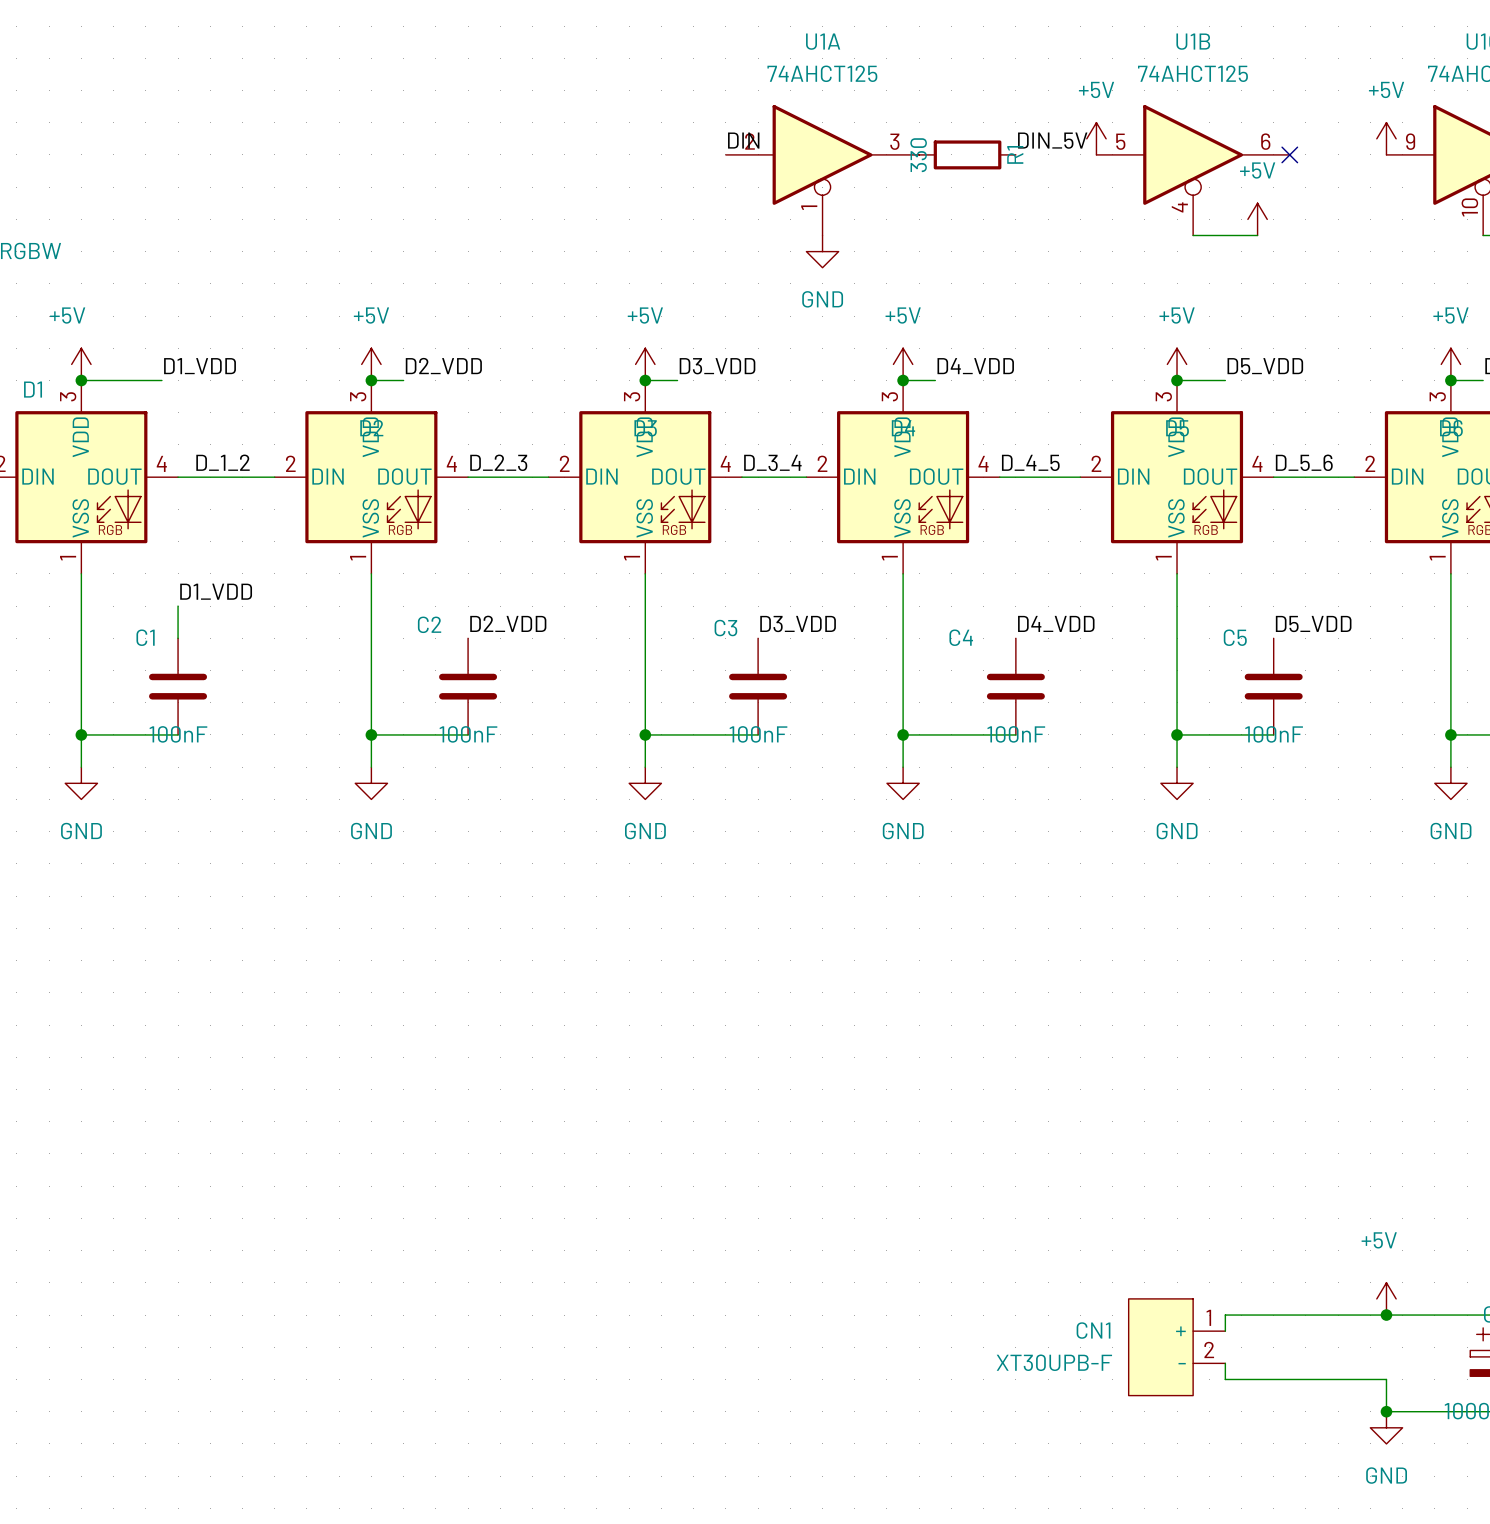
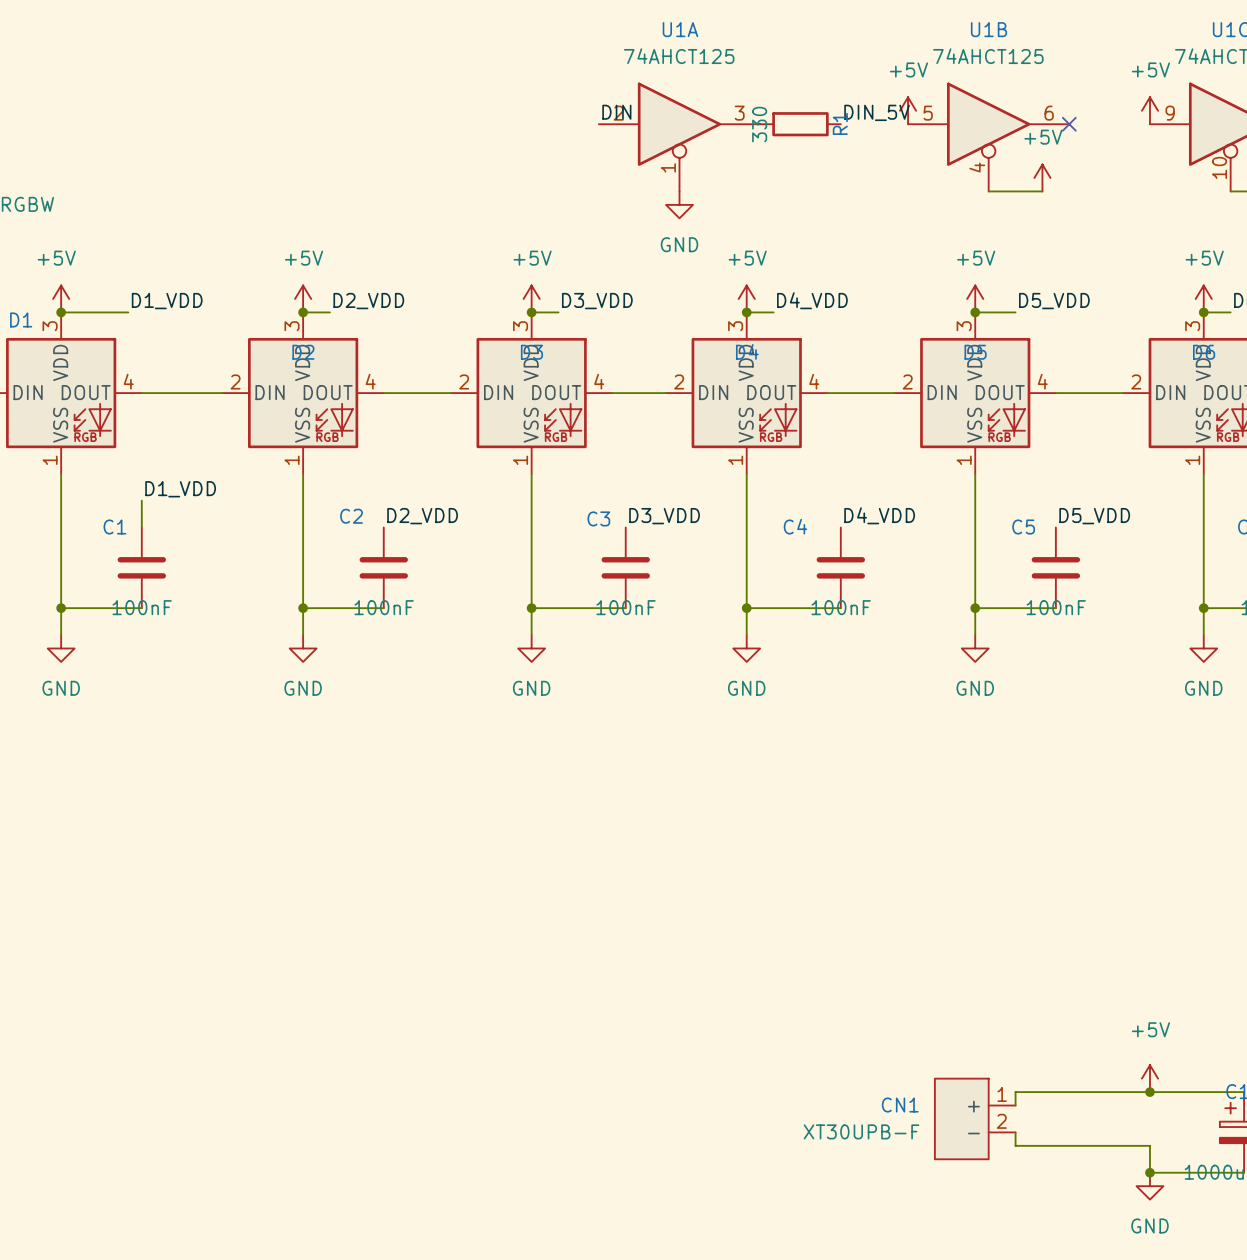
label: D_1_2 (223, 462) -> none
label: D_2_3 (498, 462) -> none
label: D_3_4 (772, 462) -> none
label: D_4_5 (1030, 462) -> none
label: D_5_6 (1304, 462) -> none

